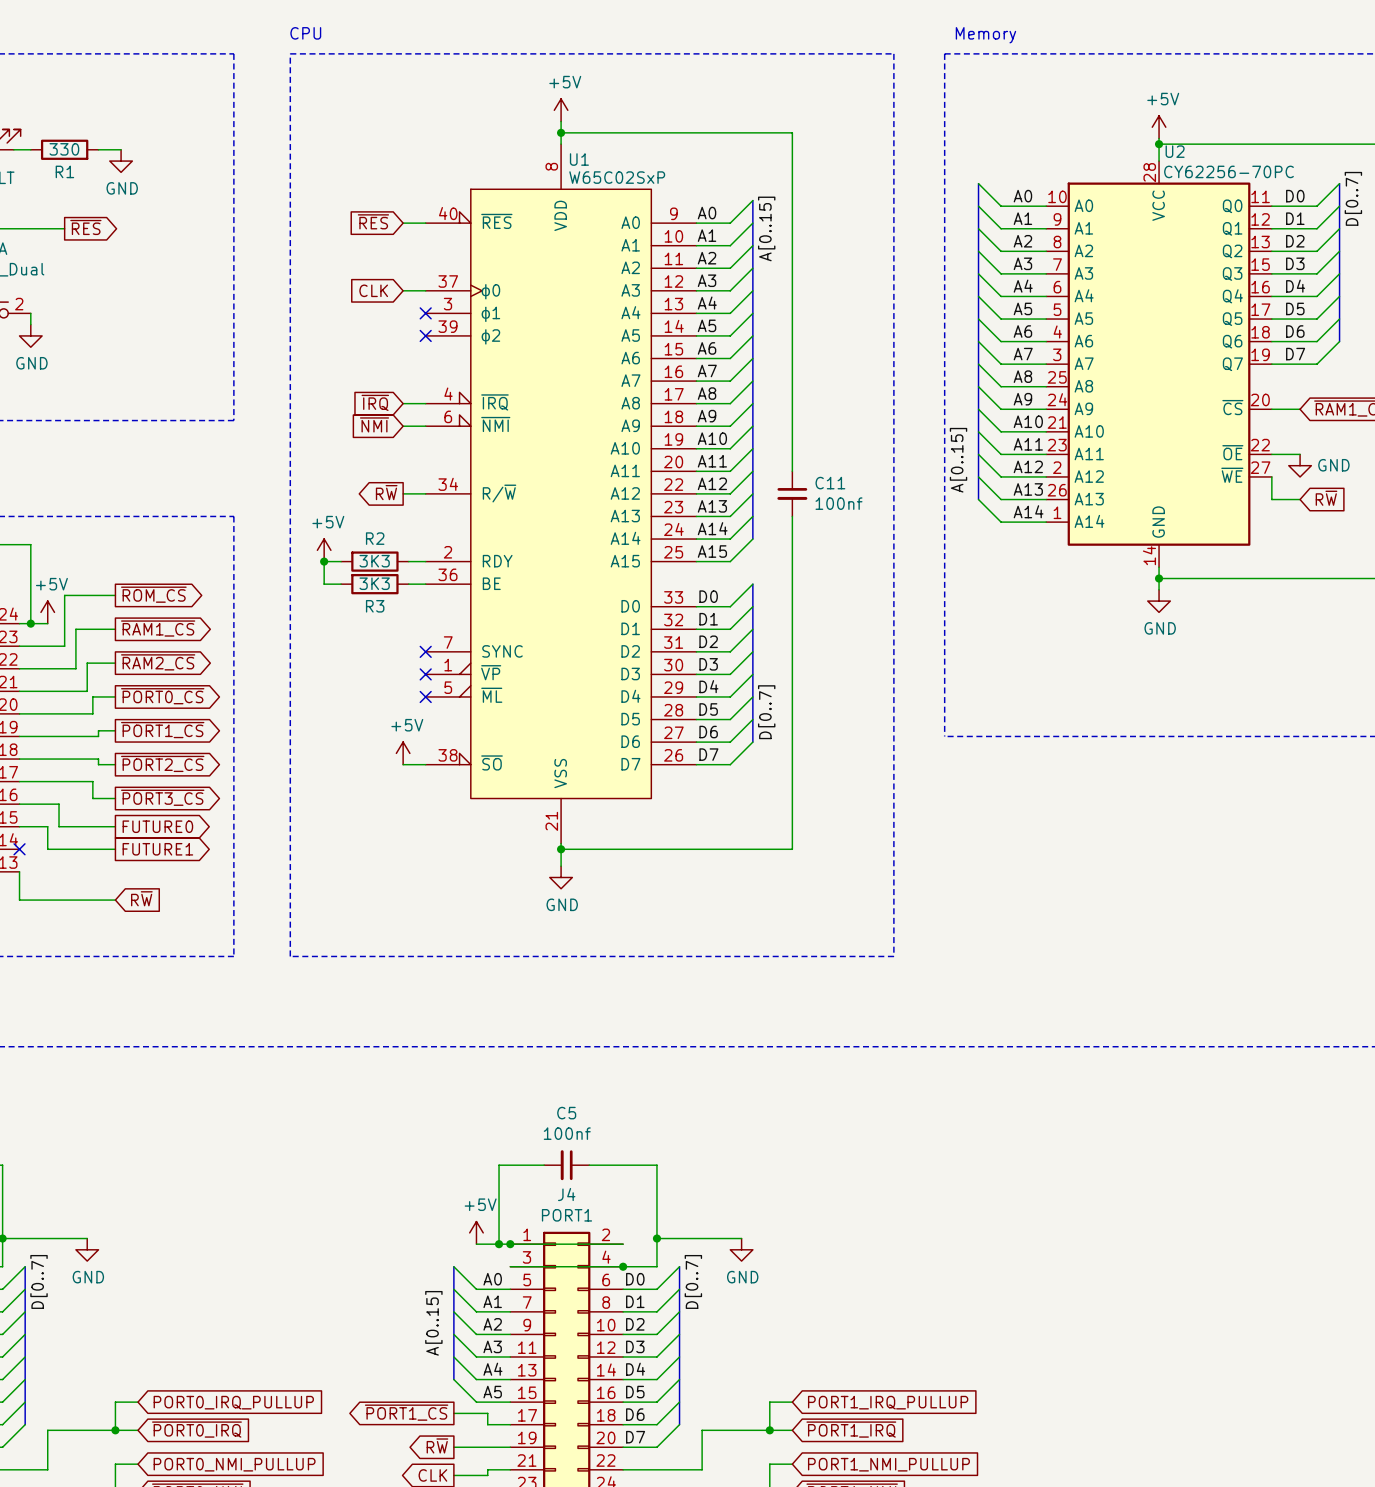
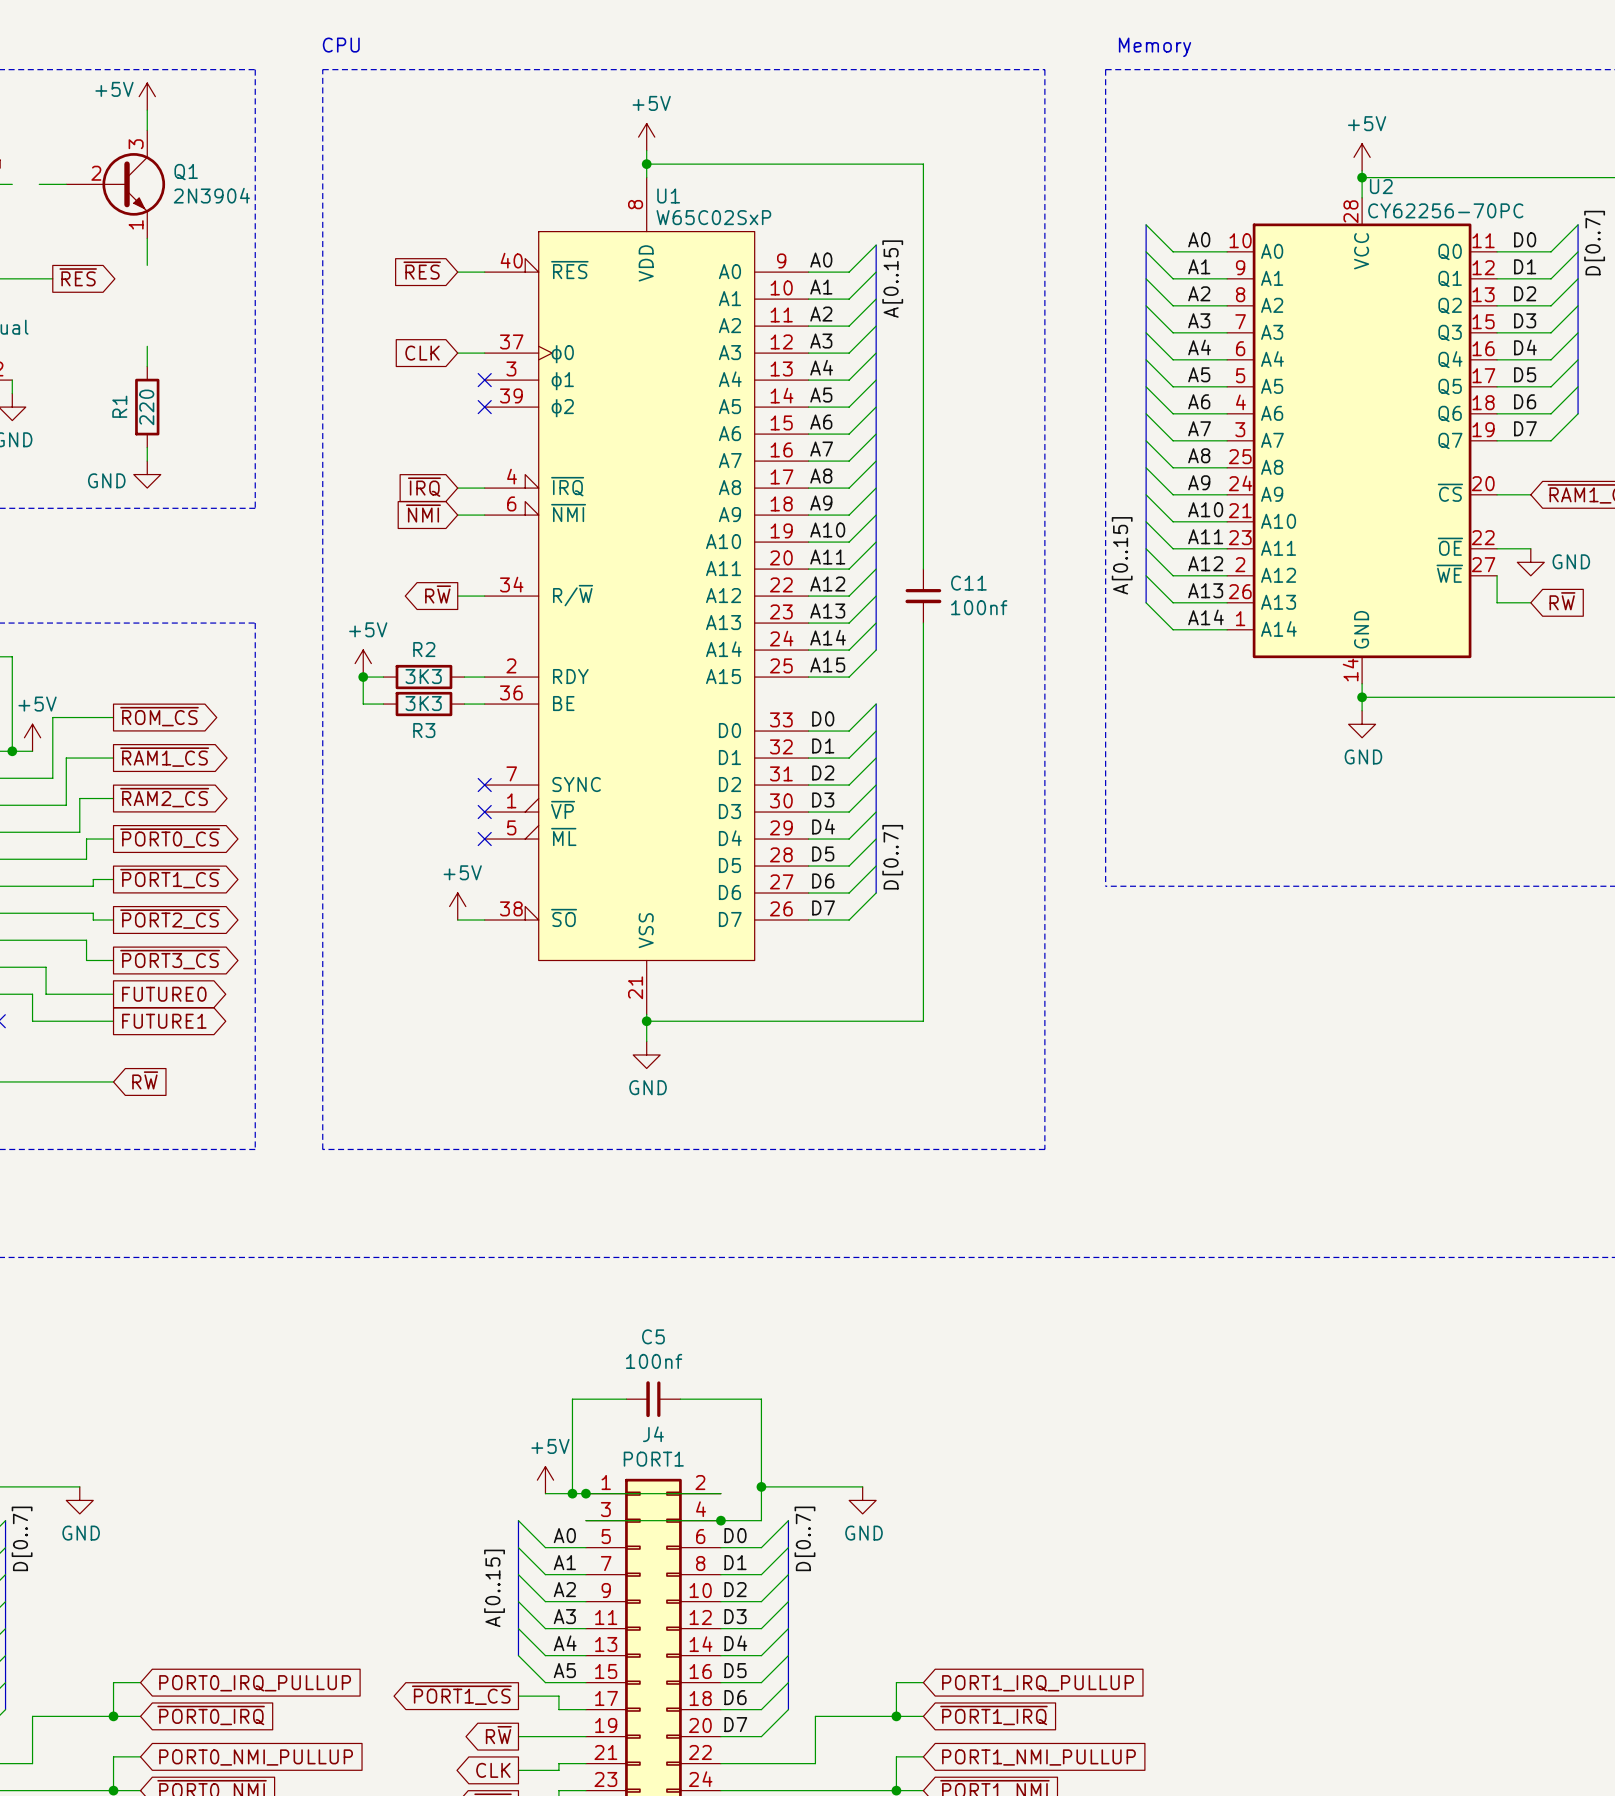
power symbol: none -> +5V (147, 96)
wire: none -> (147, 110) (147, 130)
R1 rotation: 0° (64, 149) -> 90° clockwise (147, 407)
R1 position: (64, 149) -> (147, 407)
R1 value: 330 (64, 149) -> 220 (146, 407)
Q1: none -> 2N3904 (115, 184)
power symbol: GND (121, 161) -> none
wire: none -> (147, 238) (147, 265)
wire: none -> (147, 346) (147, 366)
wire: none -> (147, 447) (147, 461)
power symbol: none -> GND (147, 474)

